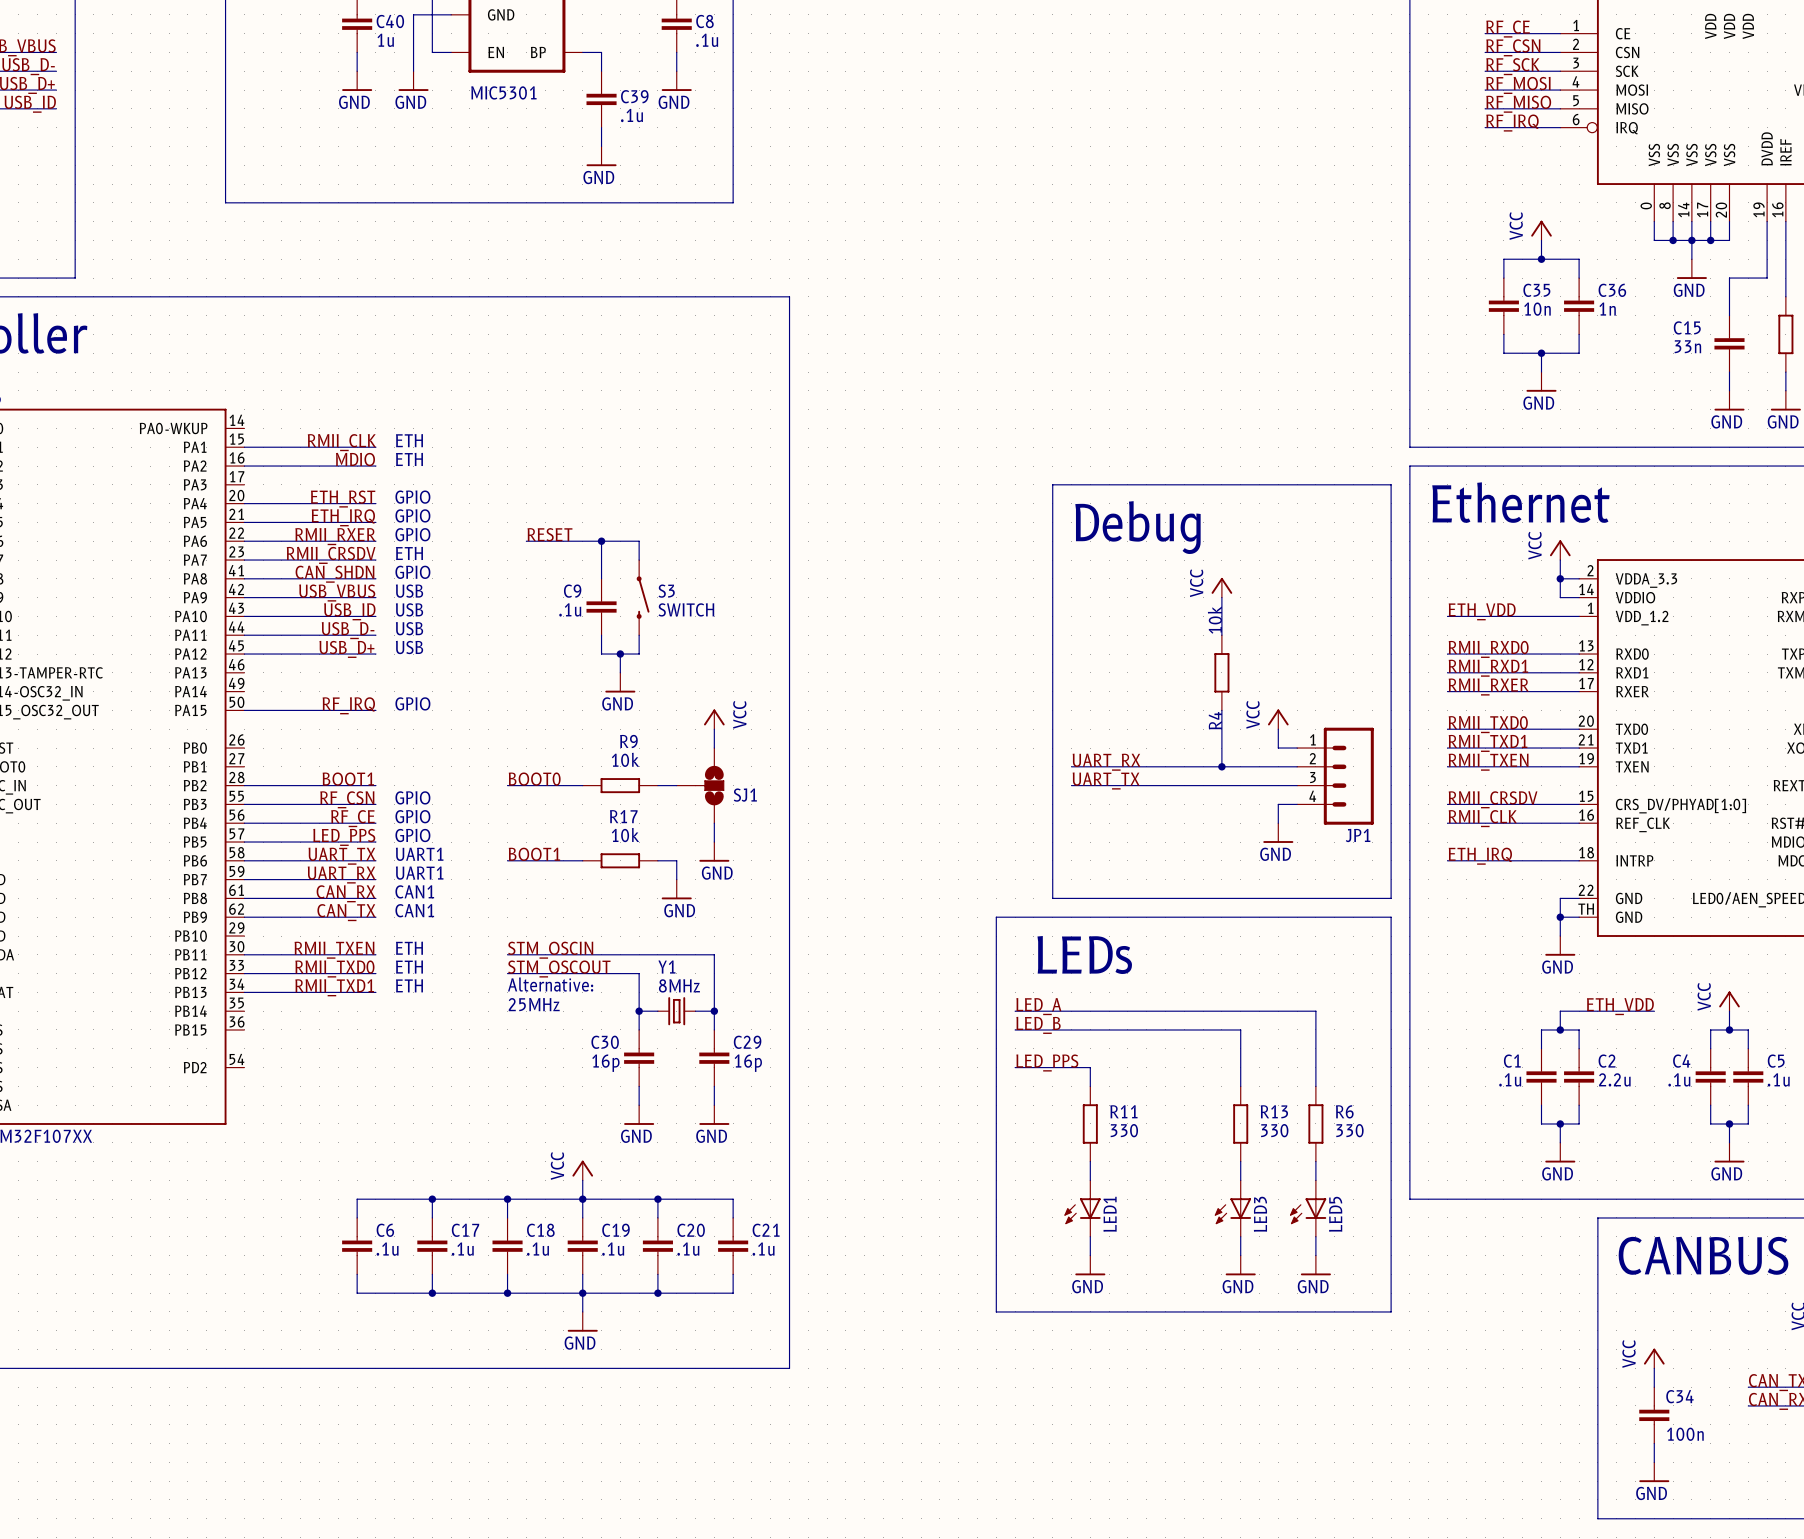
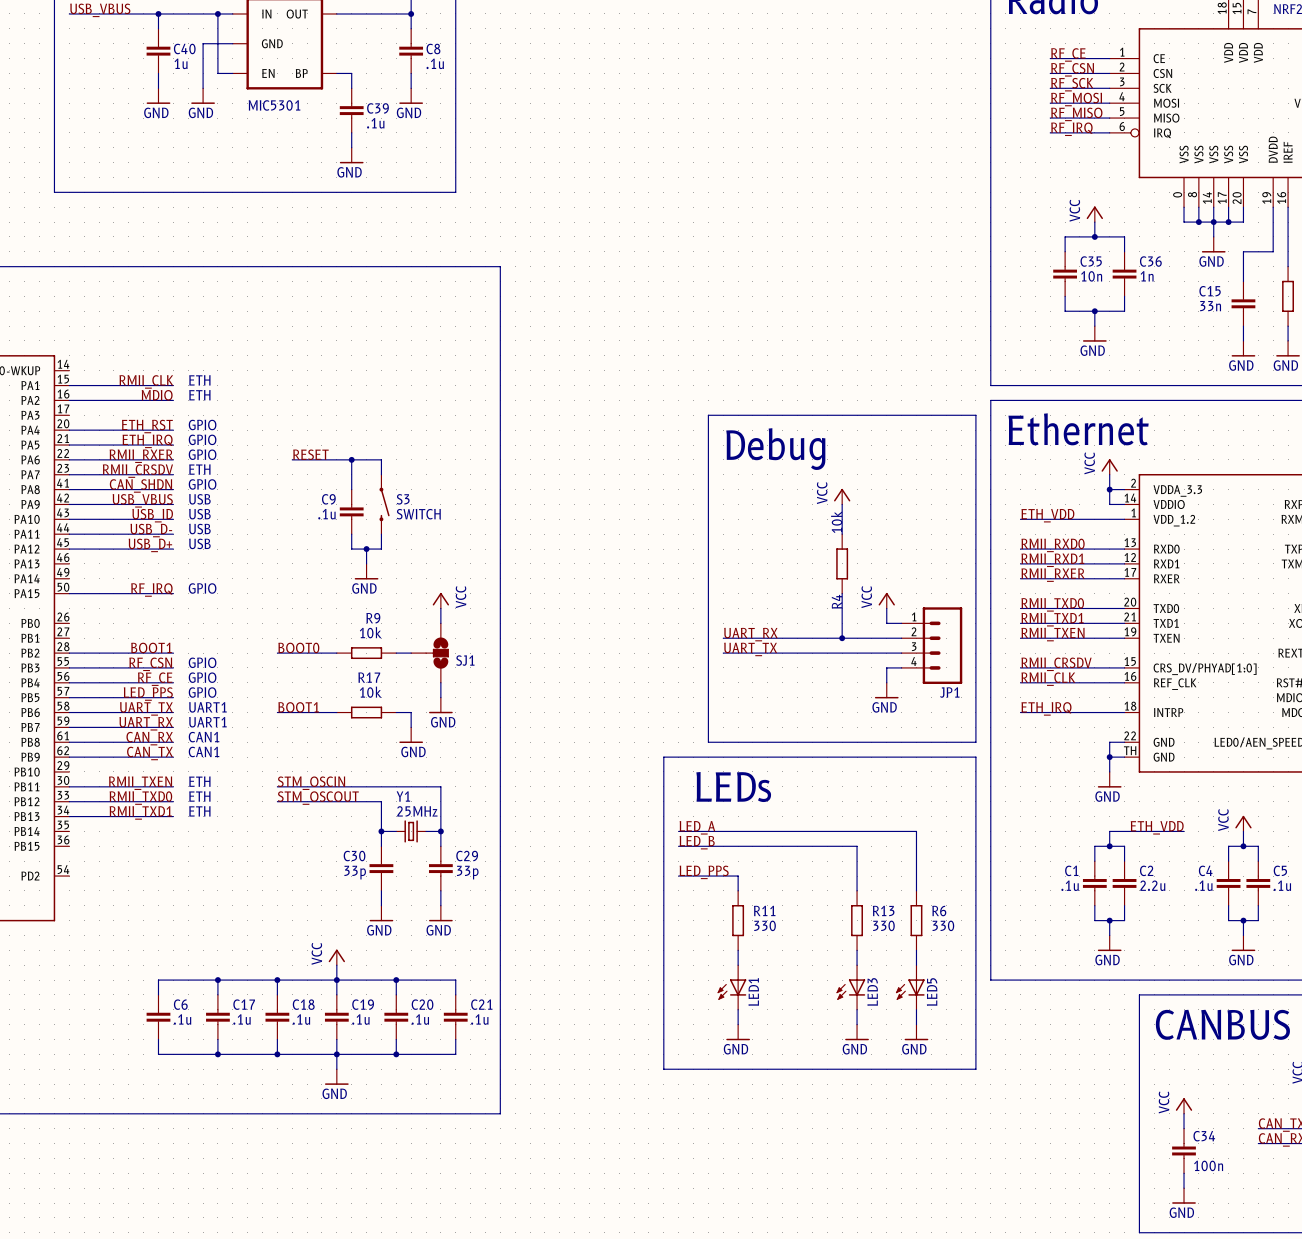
text: Alternative: (550, 984) -> none
Y1 value: 8MHz (679, 985) -> 25MHz (417, 811)
text: 25MHz (534, 1004) -> none
C30 value: 16p (605, 1063) -> 33p (355, 872)
C29 value: 16p (748, 1063) -> 33p (467, 872)

